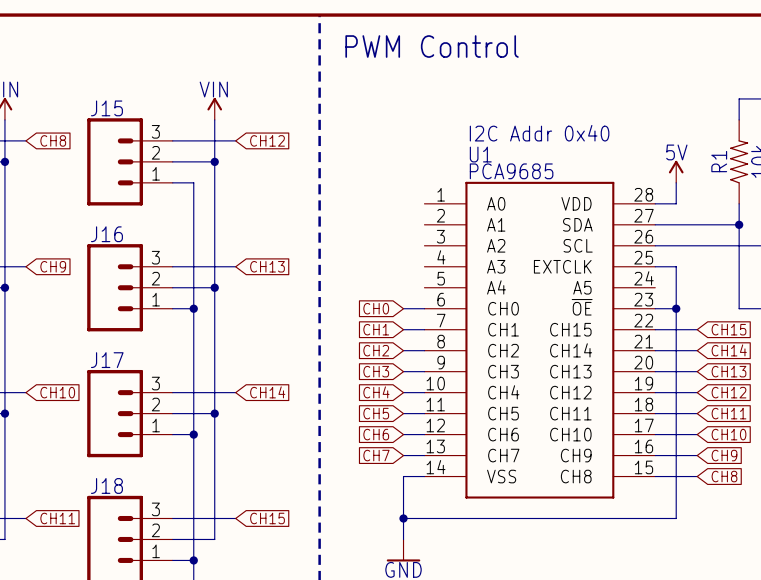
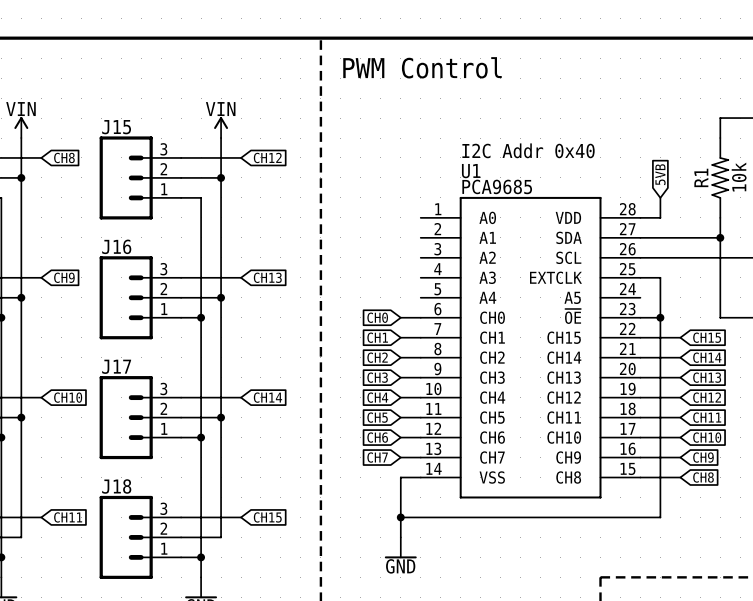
global label: none -> 5VB (660, 174)
power symbol: 5V (676, 171) -> none

